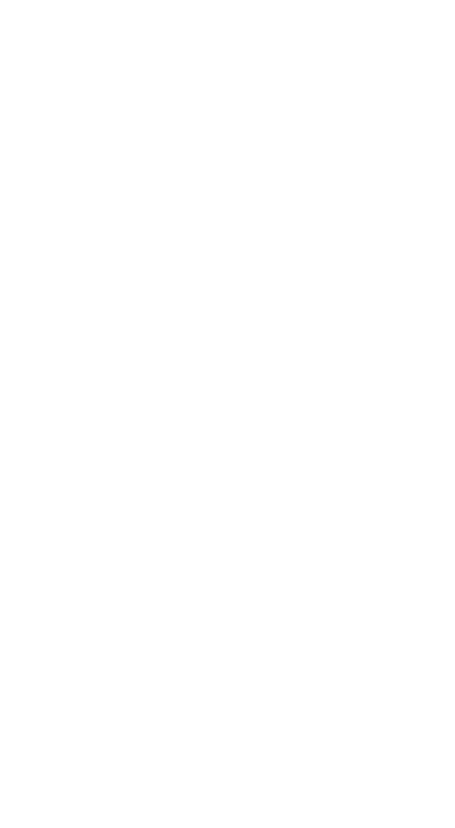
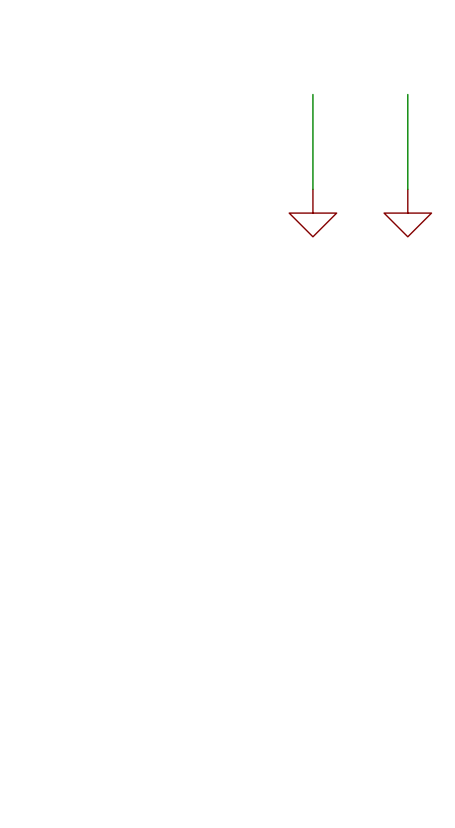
wire: none -> (312, 94) (312, 189)
wire: none -> (407, 94) (407, 189)
power symbol: none -> (312, 213)
power symbol: none -> (407, 213)

